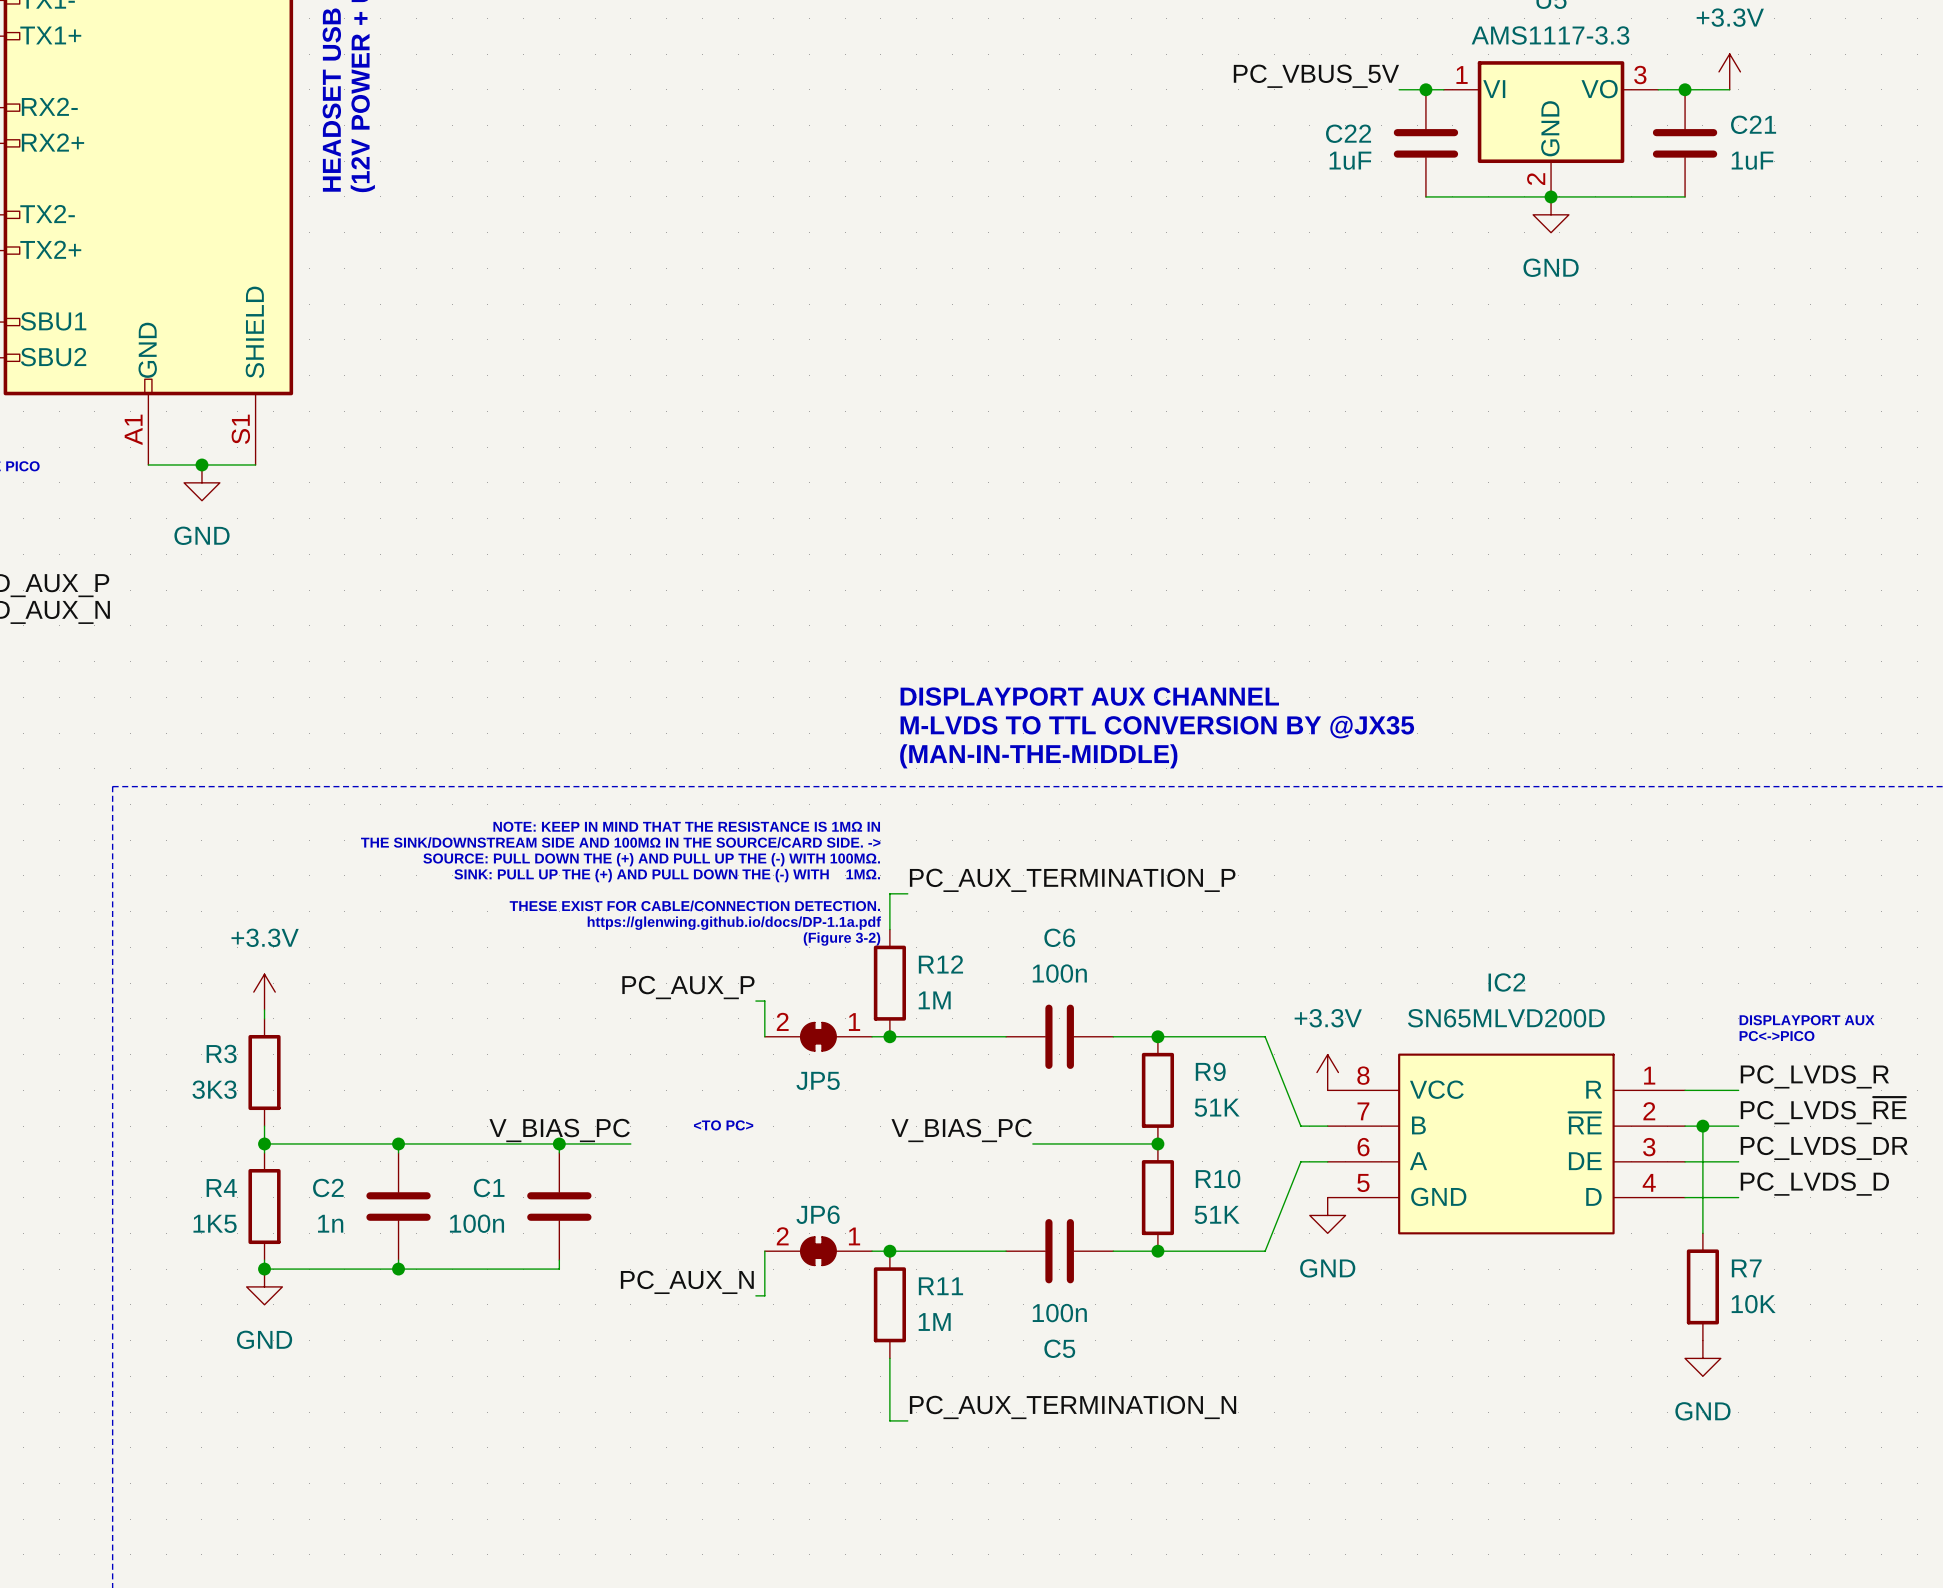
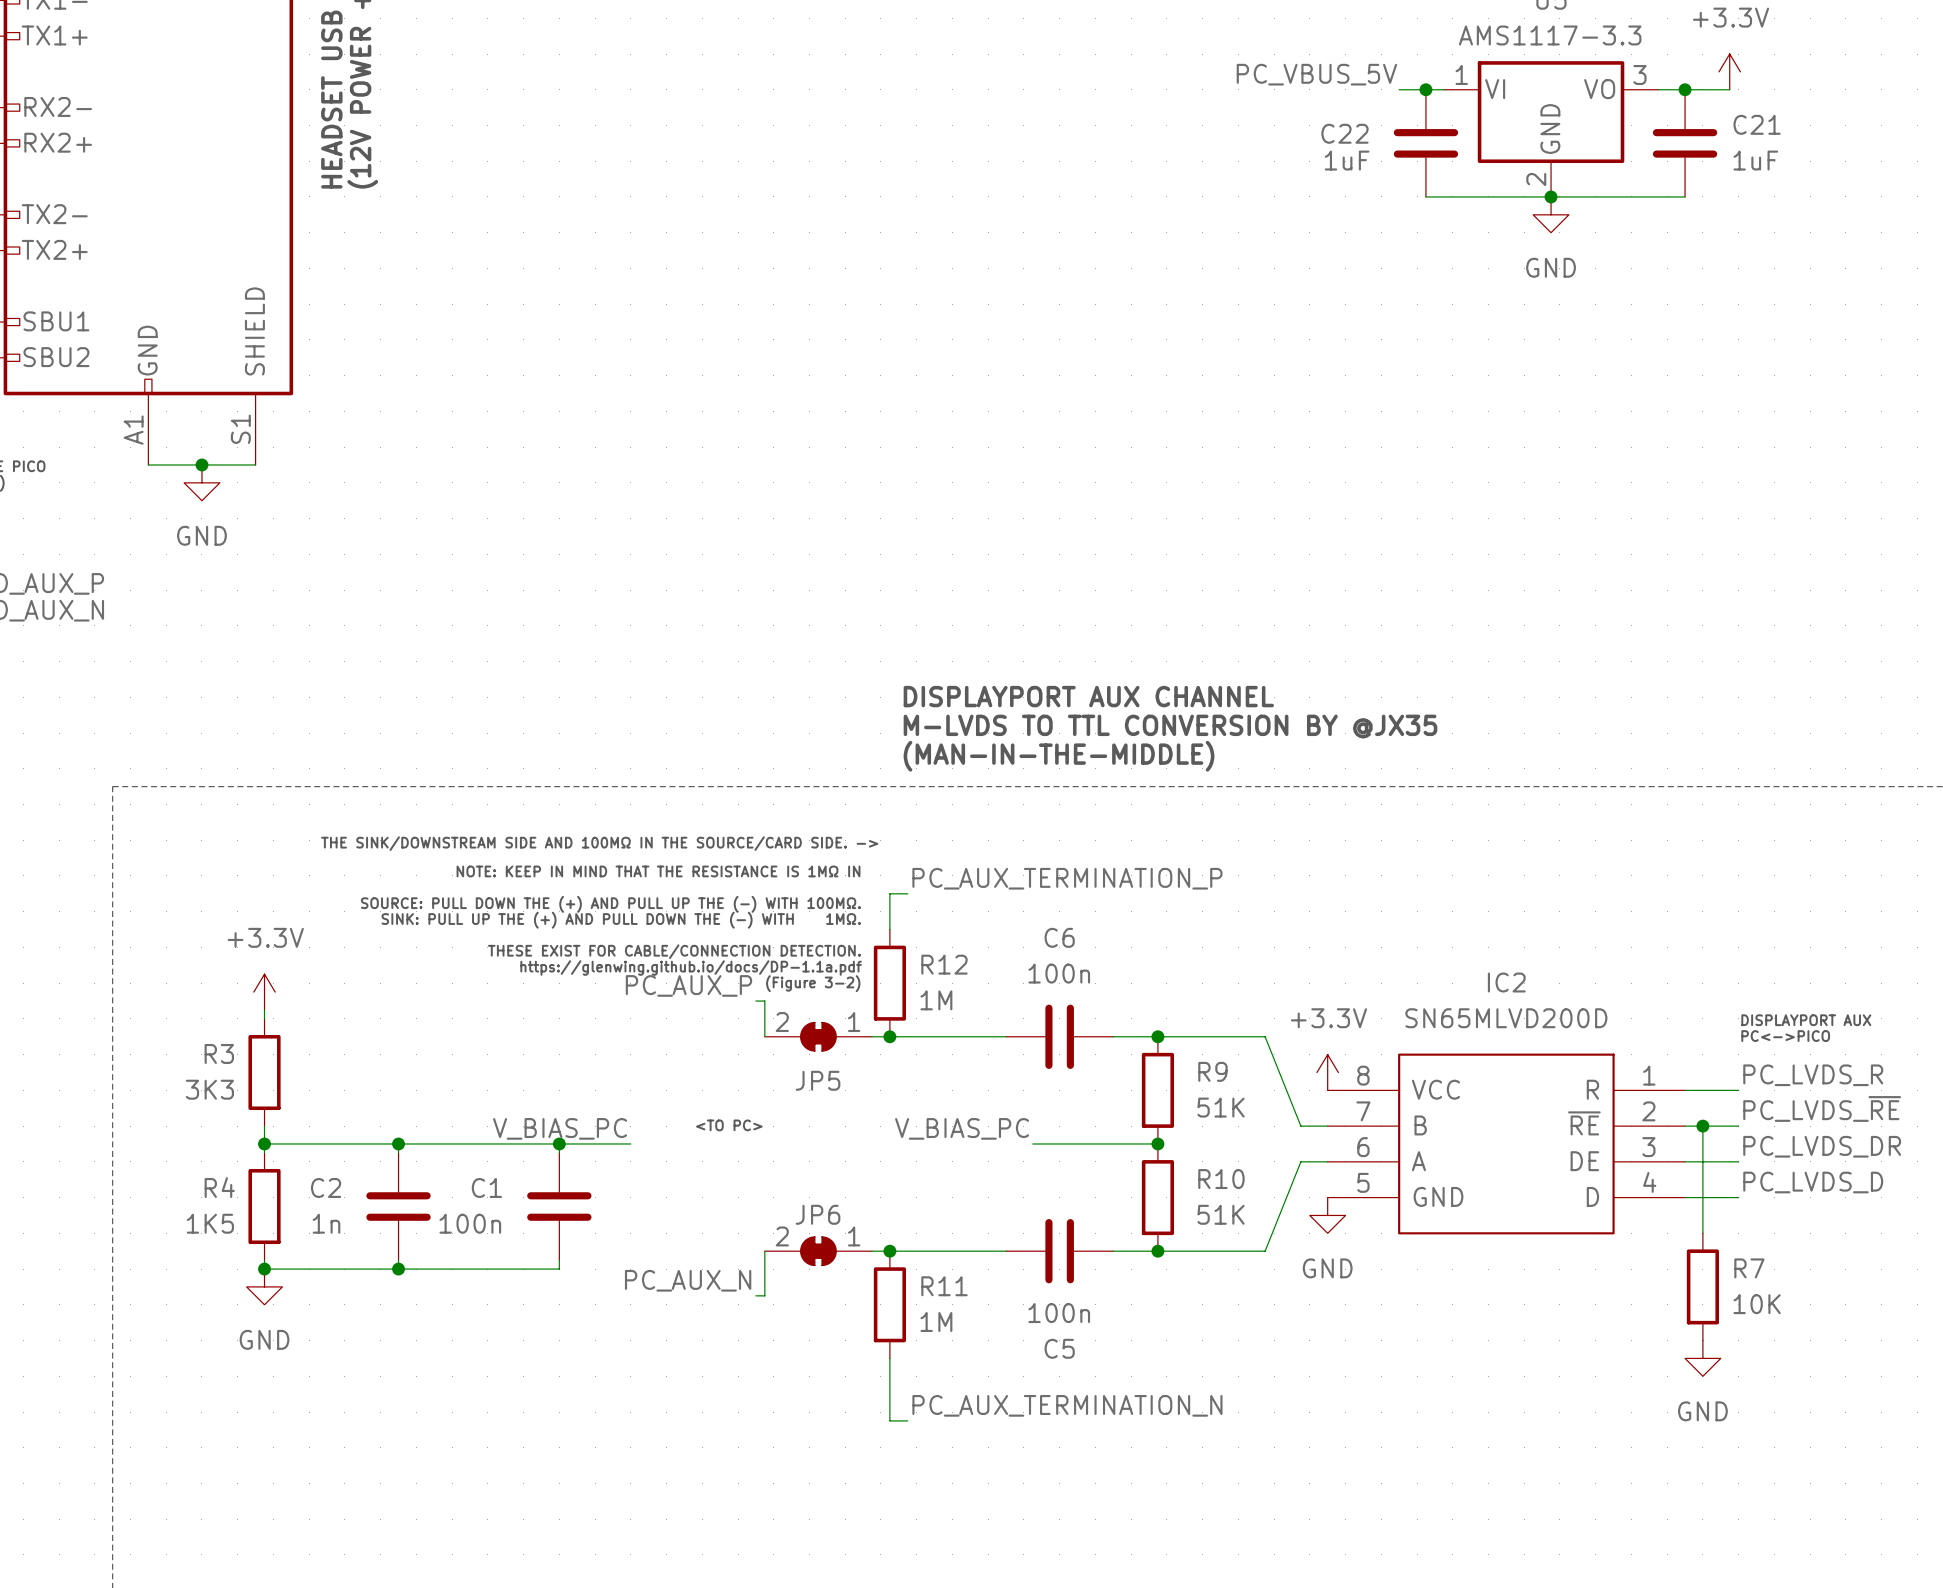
text position: NOTE: KEEP IN MIND THAT THE RESISTANCE IS 1MΩ IN (686, 826) -> NOTE: KEEP IN MIND THAT THE RESISTANCE IS 1MΩ IN (658, 871)
text position: SOURCE: PULL DOWN THE (+) AND PULL UP THE (-) WITH 100MΩ. (651, 859) -> SOURCE: PULL DOWN THE (+) AND PULL UP THE (-) WITH 100MΩ. (610, 904)
text position: SINK: PULL UP THE (+) AND PULL DOWN THE (-) WITH 1MΩ. (667, 875) -> SINK: PULL UP THE (+) AND PULL DOWN THE (-) WITH 1MΩ. (621, 920)
text position: THESE EXIST FOR CABLE/CONNECTION DETECTION. (694, 905) -> THESE EXIST FOR CABLE/CONNECTION DETECTION. (674, 951)
text position: https://glenwing.github.io/docs/DP-1.1a.pdf (734, 923) -> https://glenwing.github.io/docs/DP-1.1a.pdf (691, 968)
text position: (Figure 3-2) (842, 939) -> (Figure 3-2) (813, 983)

